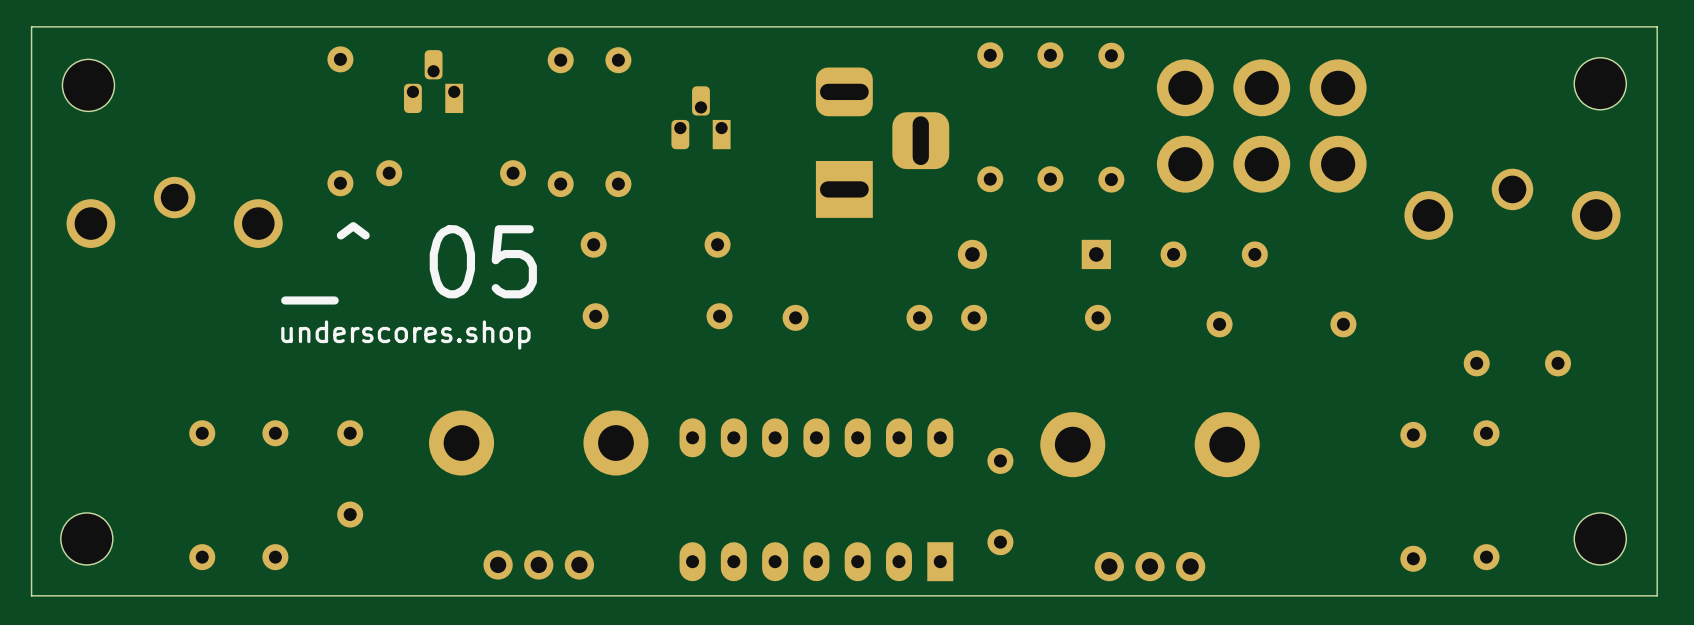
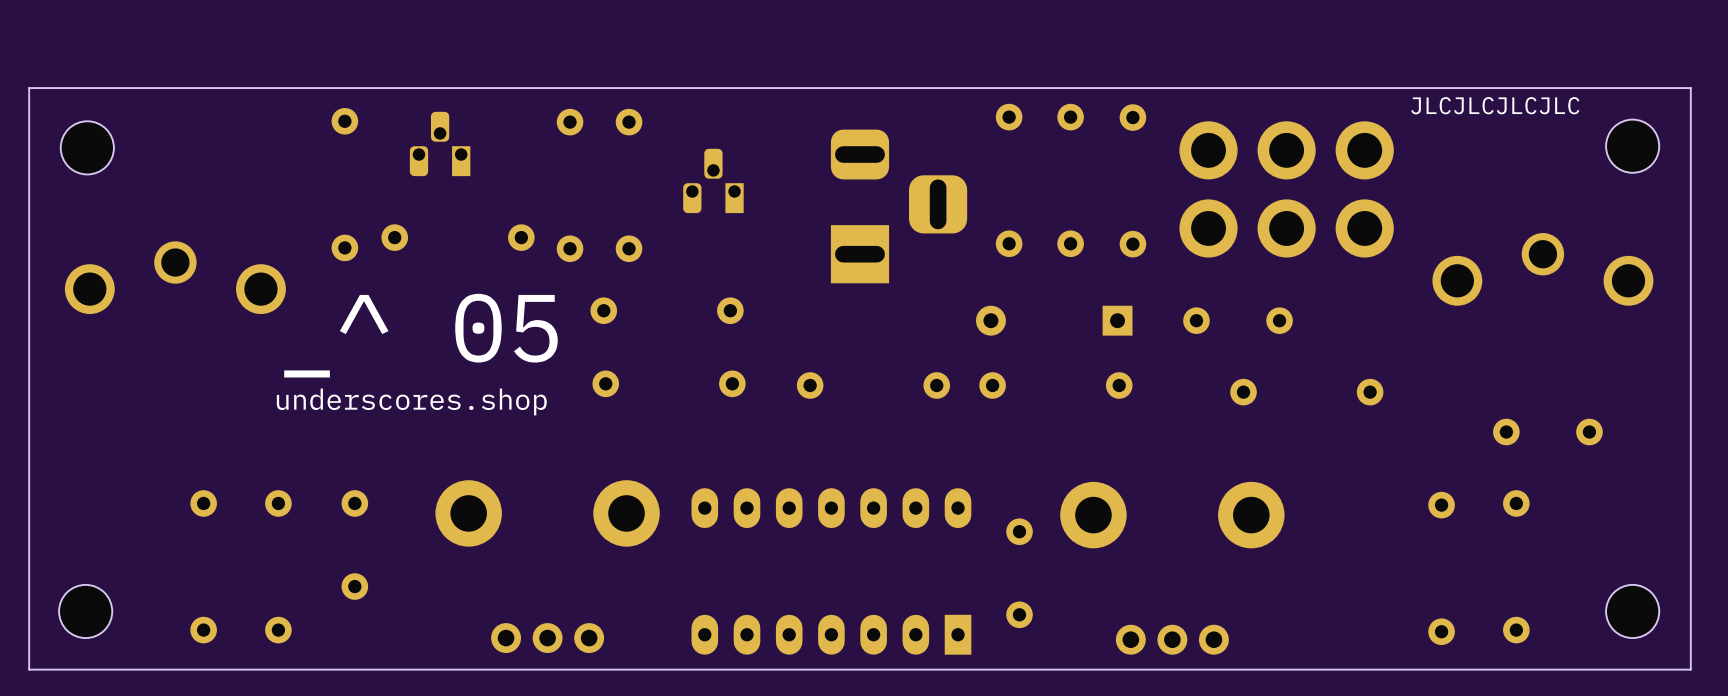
text: none -> JLCJLCJLCJLC (1495, 105)

